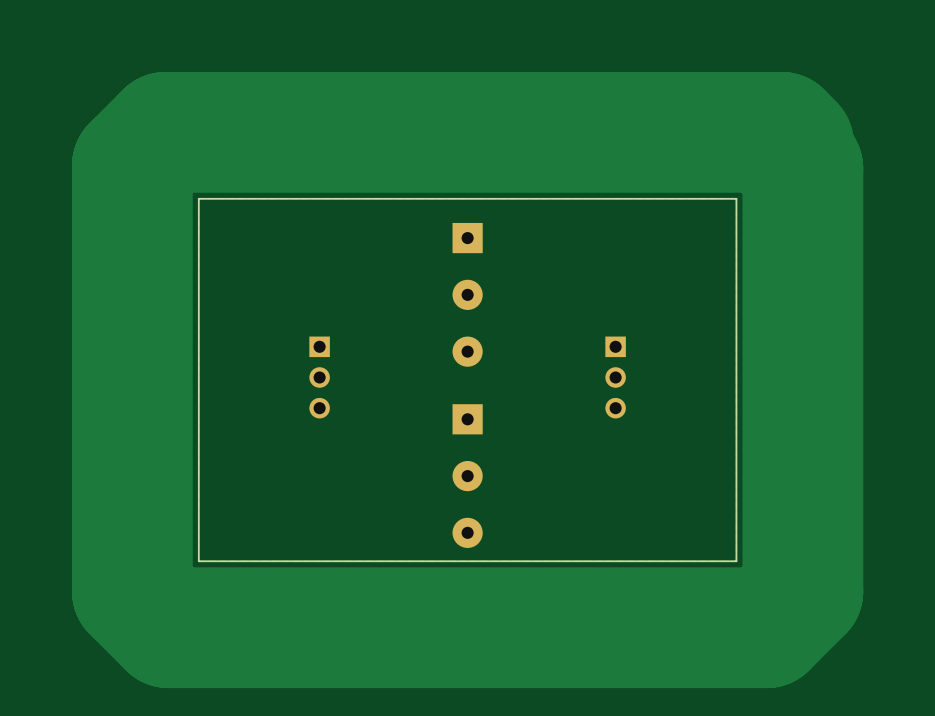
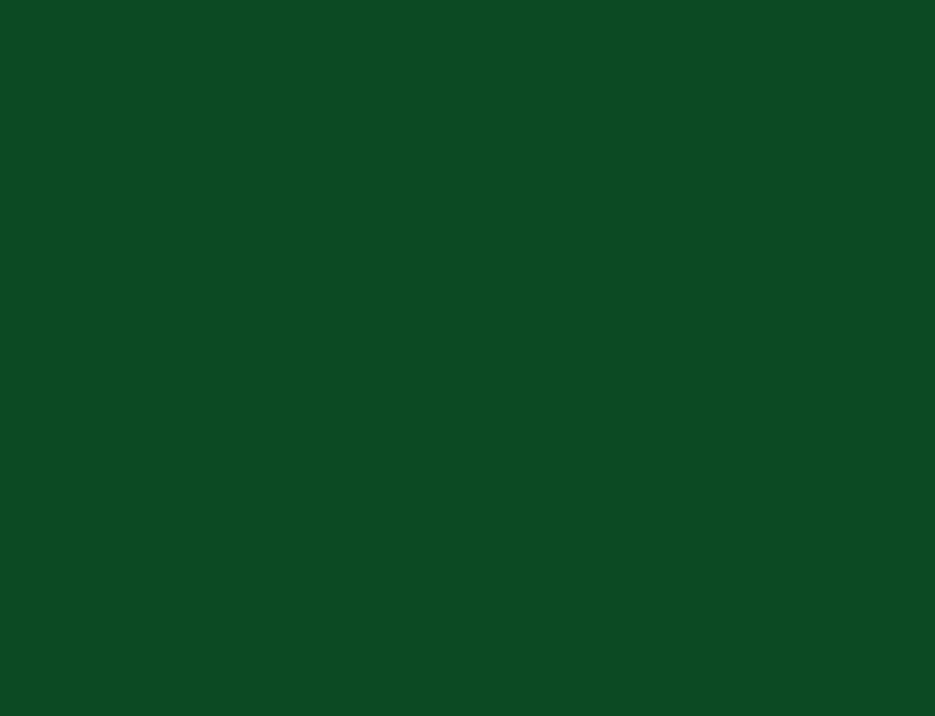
track: (766, 132) (802, 168) (802, 591) (766, 627) (168, 627) (132, 591) (132, 165) (165, 132) (781, 132) (793, 144) -> none
board edge: (736, 198) (736, 561) (198, 561) (198, 198) (736, 198) -> none
part: (467, 294) -> none
part: (319, 377) -> none
part: (615, 377) -> none
part: (467, 476) -> none

